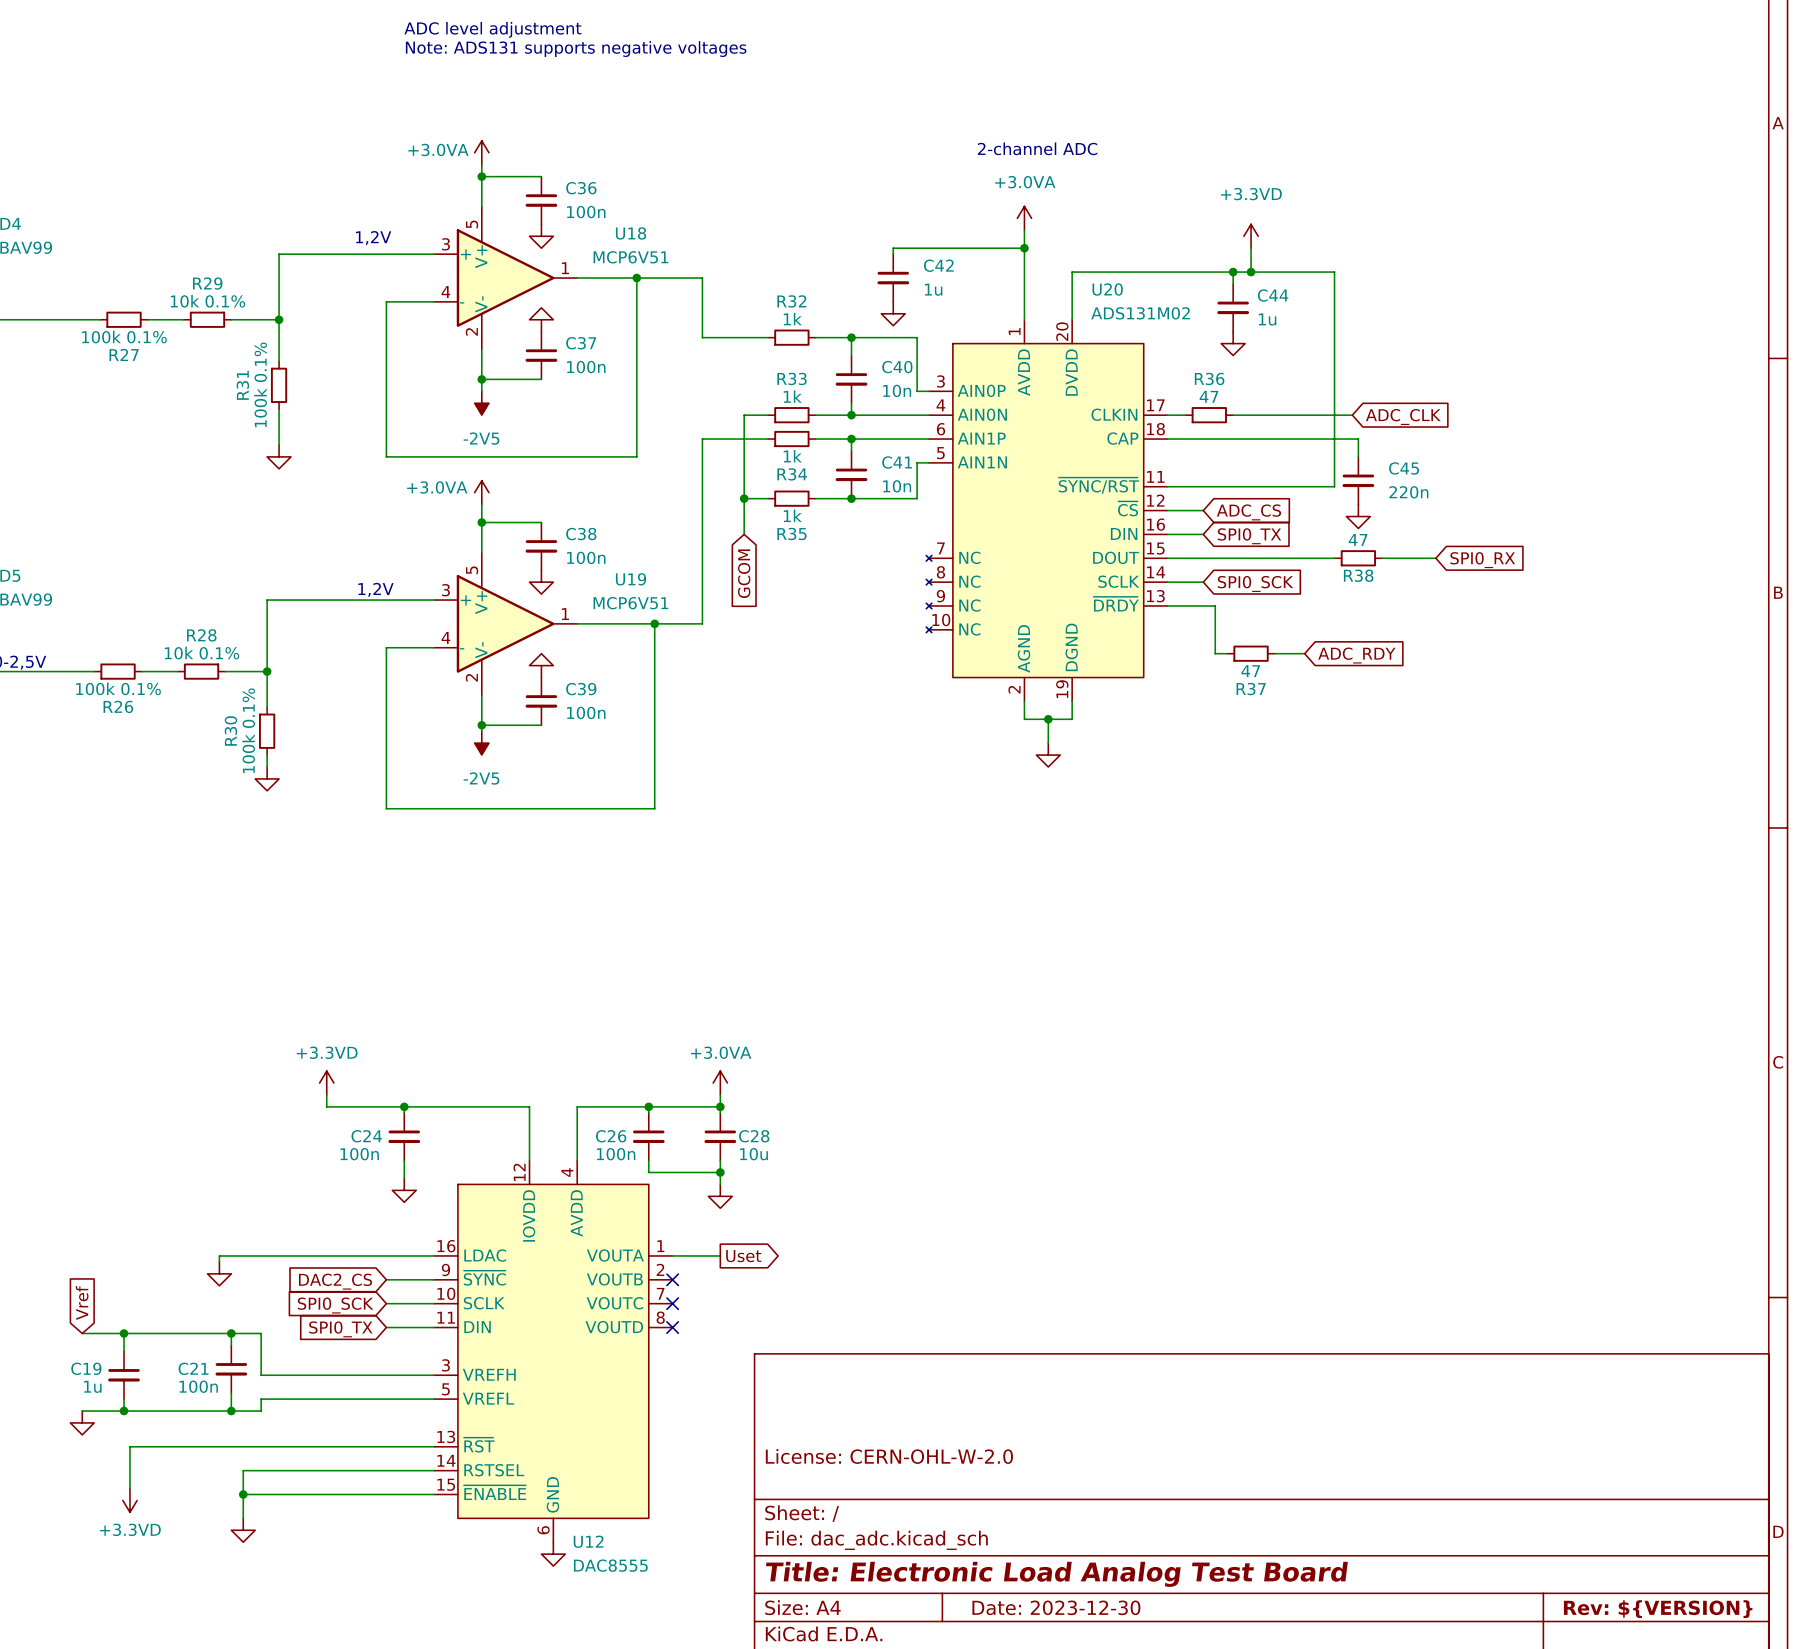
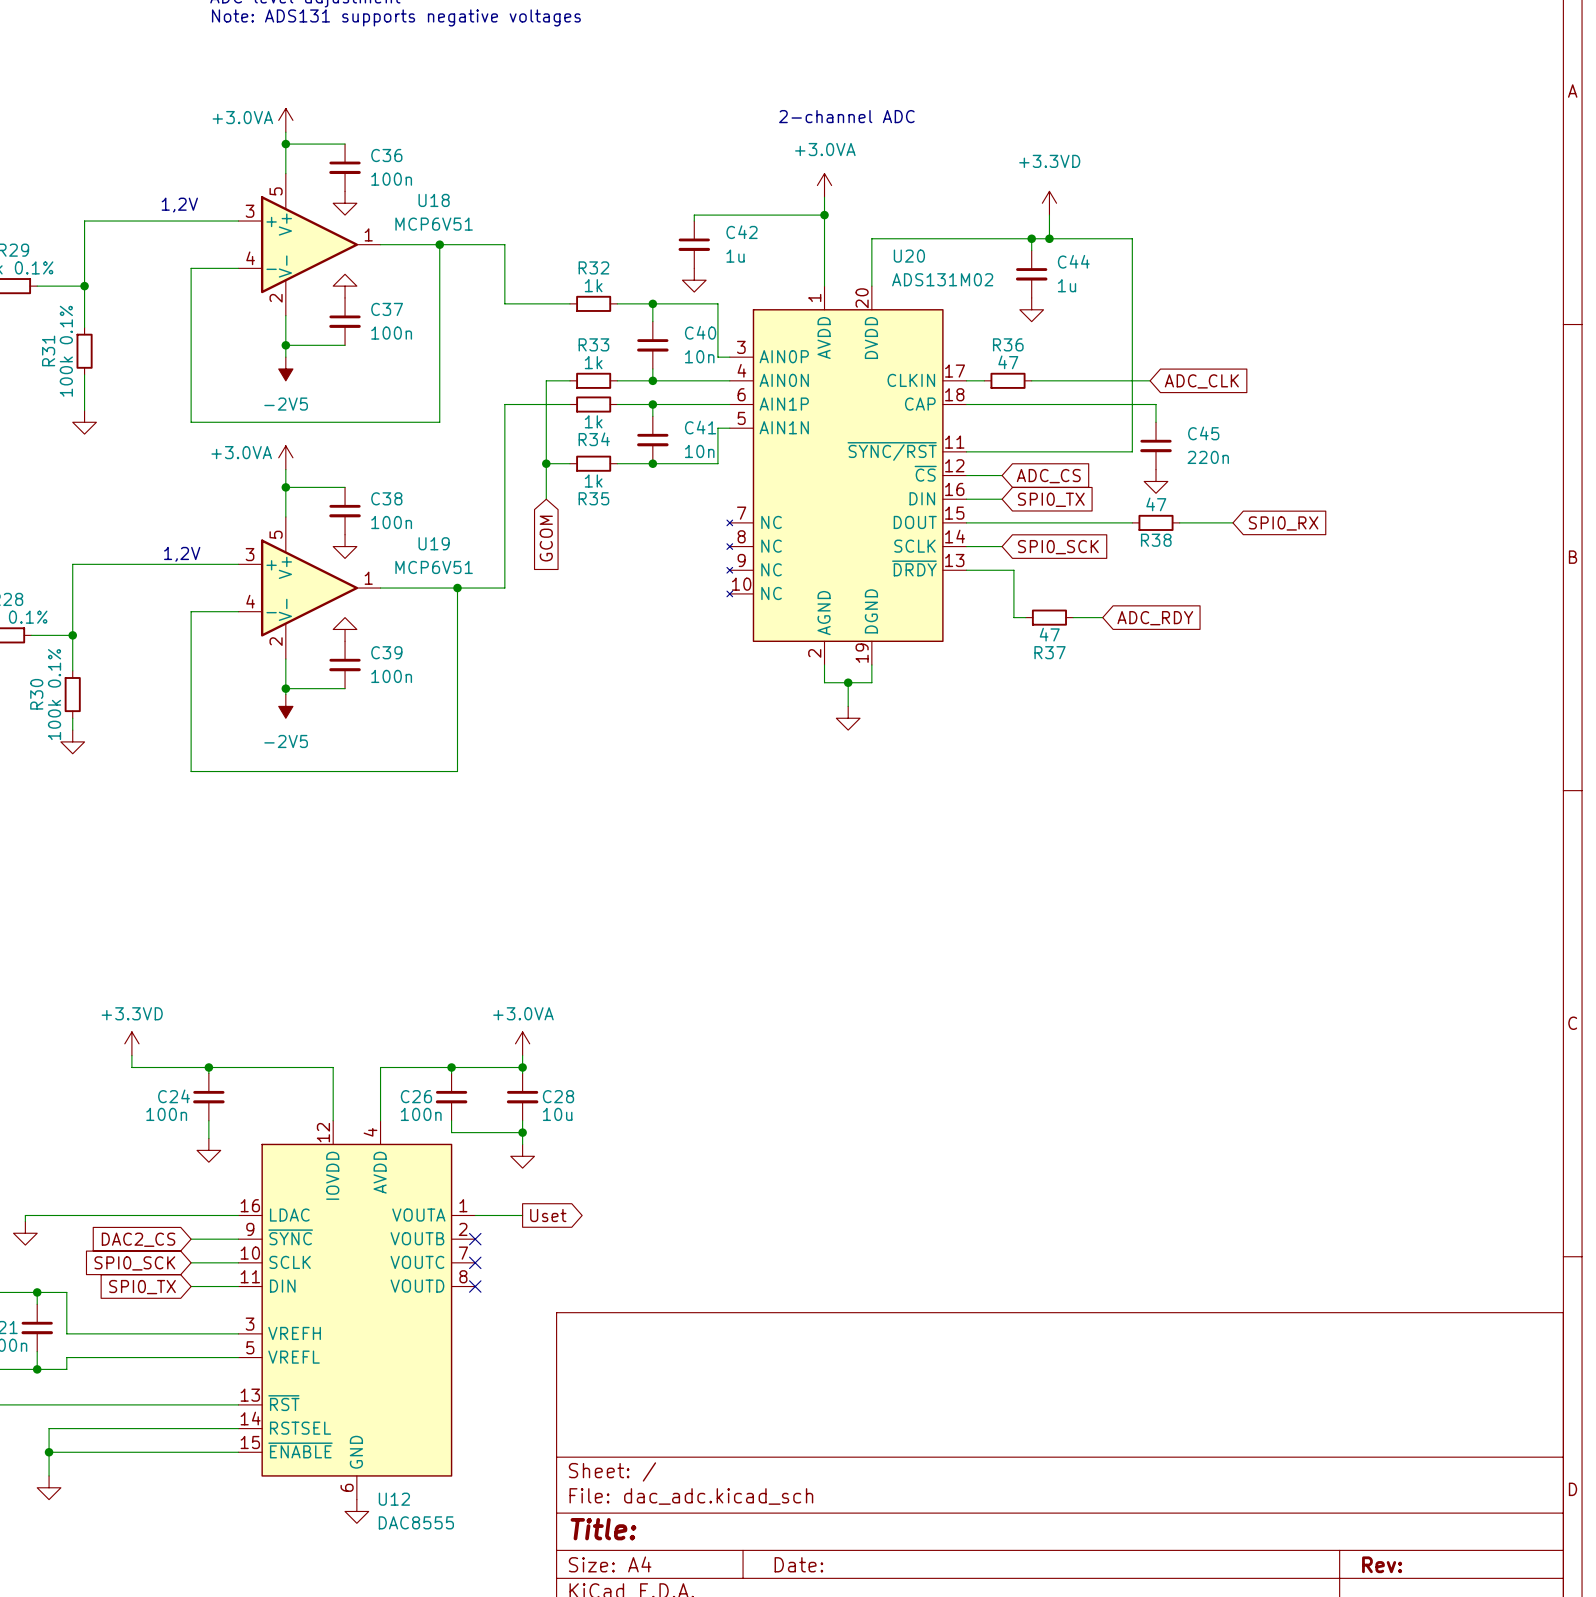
title block: License: CERN-OHL-W-2.0 (889, 1456) -> none
title block: Title: Electronic Load Analog Test Board (1056, 1574) -> Title: (603, 1529)
title block: Date: 2023-12-30 (1056, 1607) -> Date: (798, 1564)
title block: Rev: ${VERSION} (1658, 1609) -> Rev: (1382, 1564)

